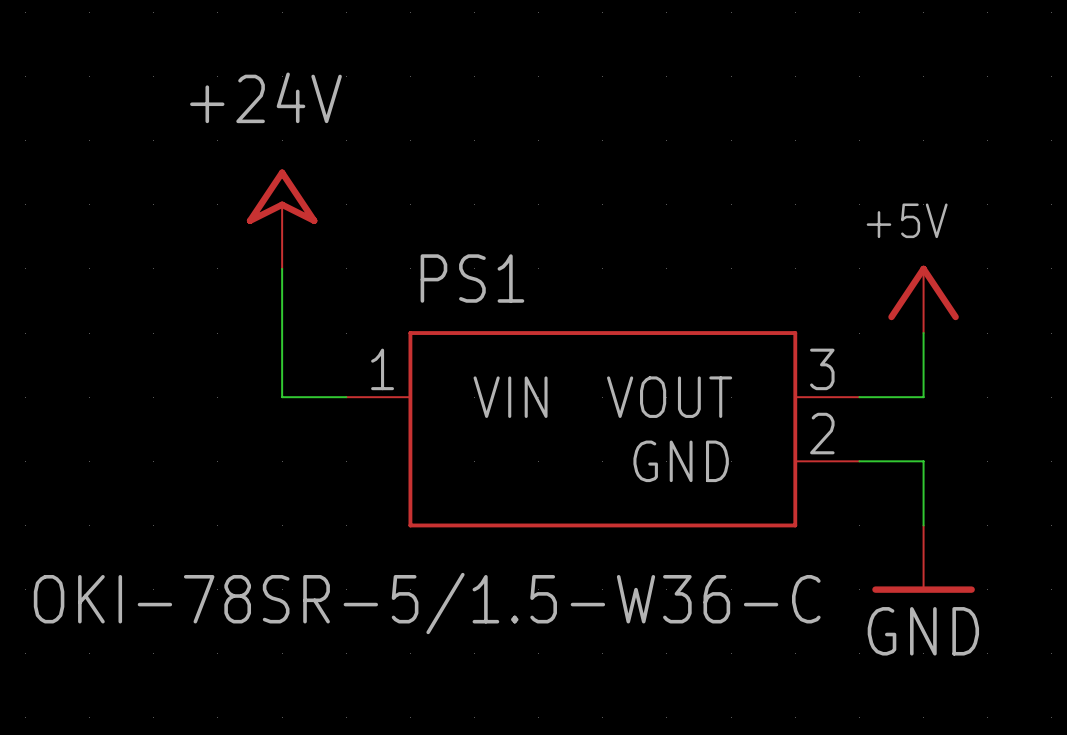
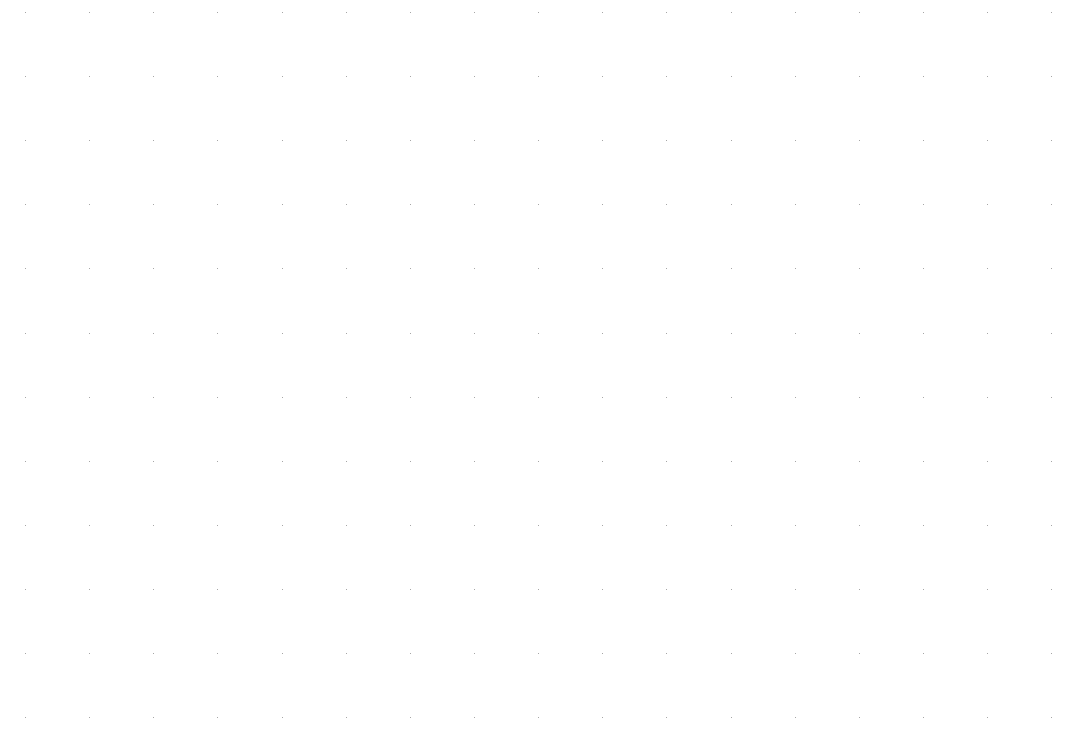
power symbol: +24V (282, 219) -> none
wire: (282, 268) (282, 397) (346, 397) -> none
power symbol: +5V (923, 299) -> none
wire: (923, 333) (923, 397) (859, 397) -> none
PS1: OKI-78SR-5/1.5-W36-C (602, 429) -> none
wire: (859, 461) (923, 461) (923, 525) -> none
power symbol: GND (923, 559) -> none

